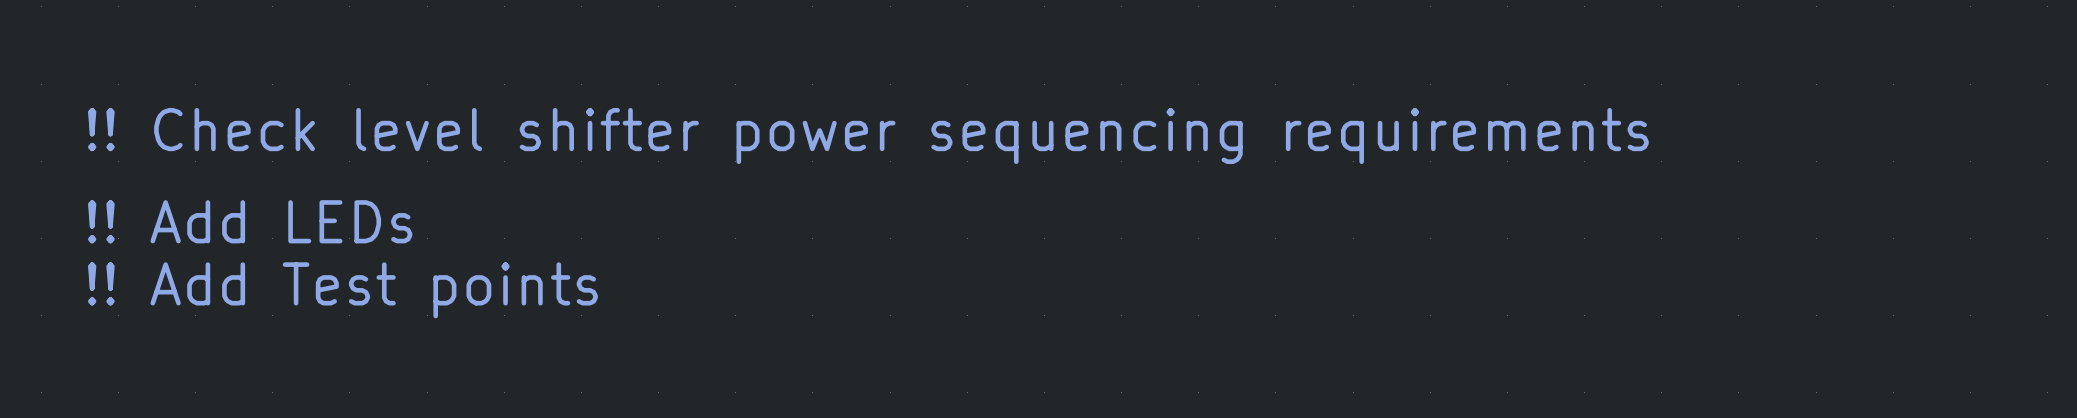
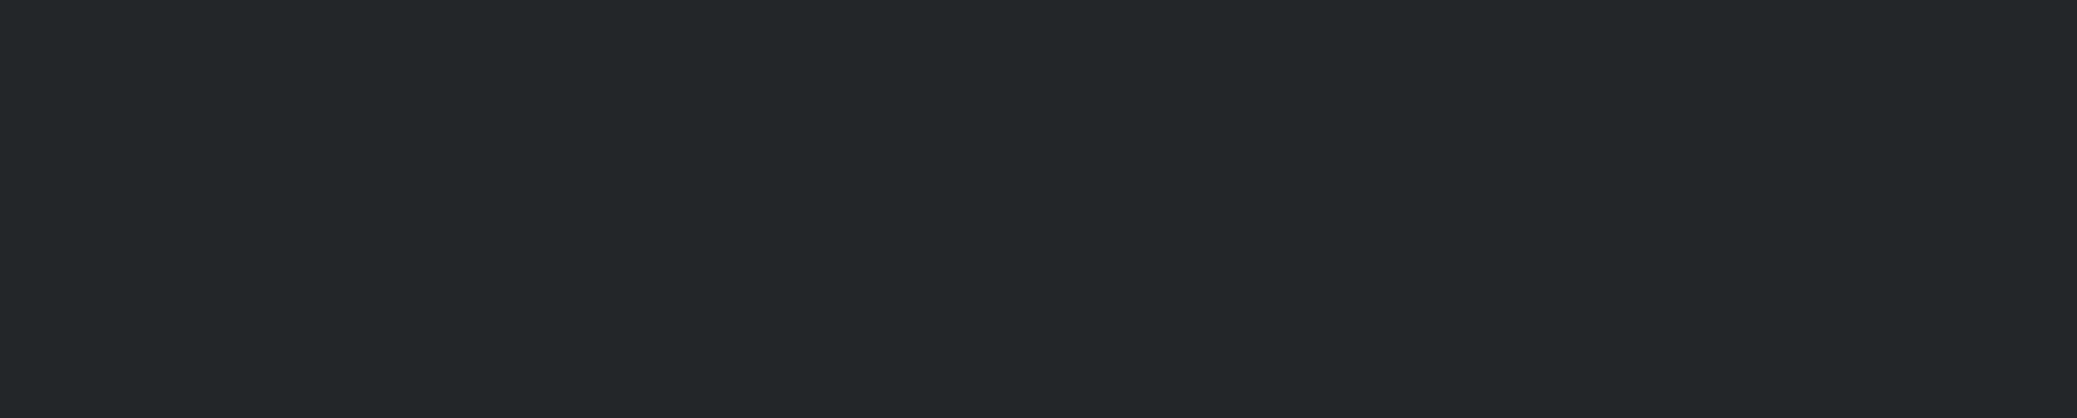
text: !! Check level shifter power sequencing requirements (868, 135) -> none
text: !! Add LEDs (250, 221) -> none
text: !! Add Test points (342, 290) -> none

